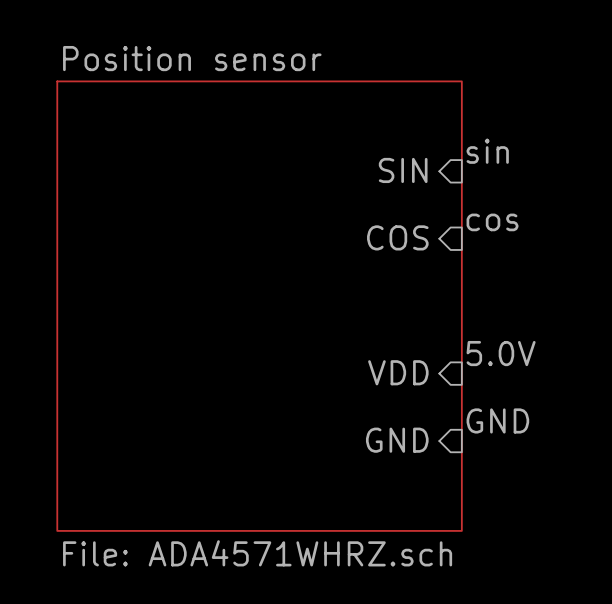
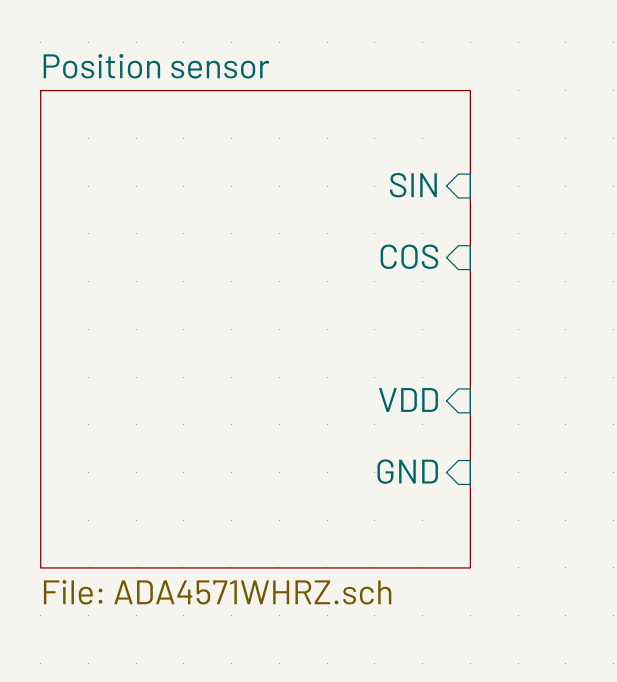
label: sin (487, 151) -> none
label: cos (492, 222) -> none
label: 5.0V (501, 353) -> none
label: GND (497, 420) -> none

